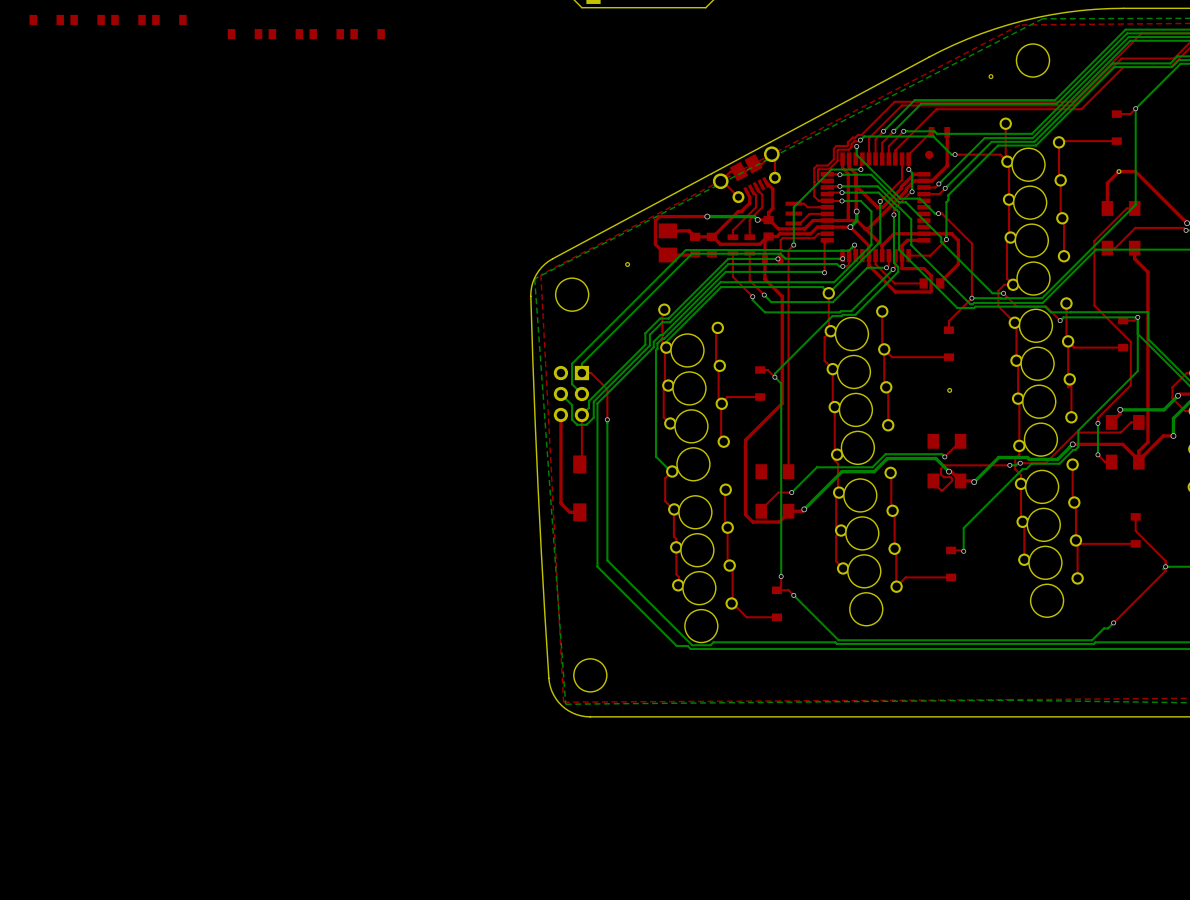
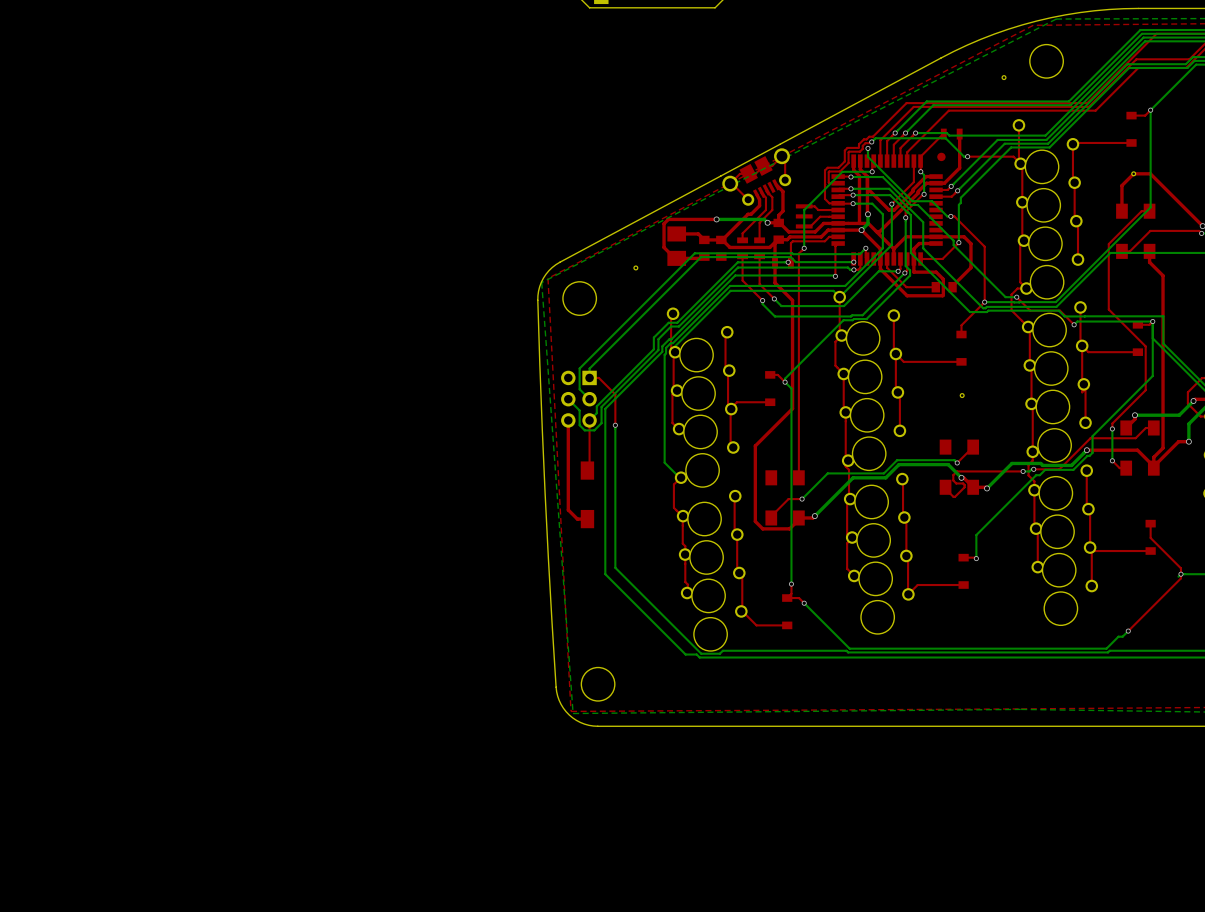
part: (46, 19) -> none
part: (87, 19) -> none
part: (128, 19) -> none
part: (169, 19) -> none
part: (244, 34) -> none
part: (285, 34) -> none
part: (326, 34) -> none
part: (367, 34) -> none

